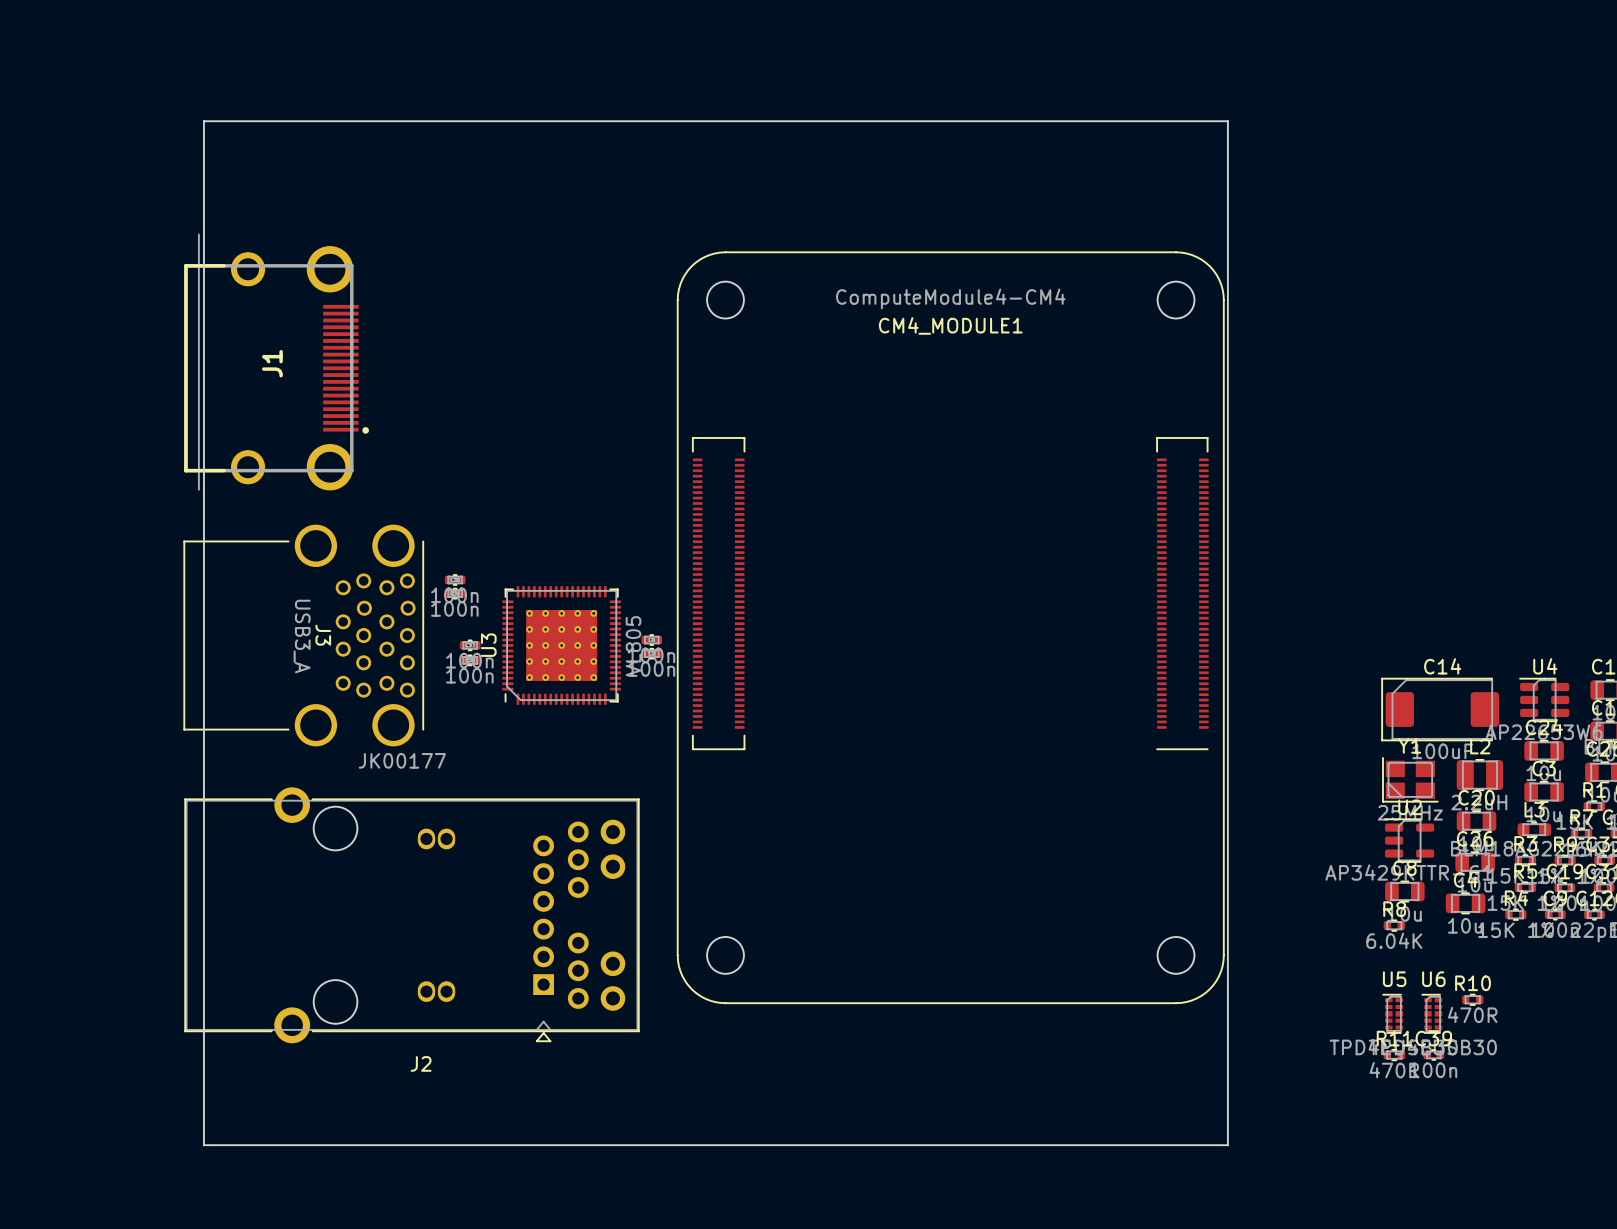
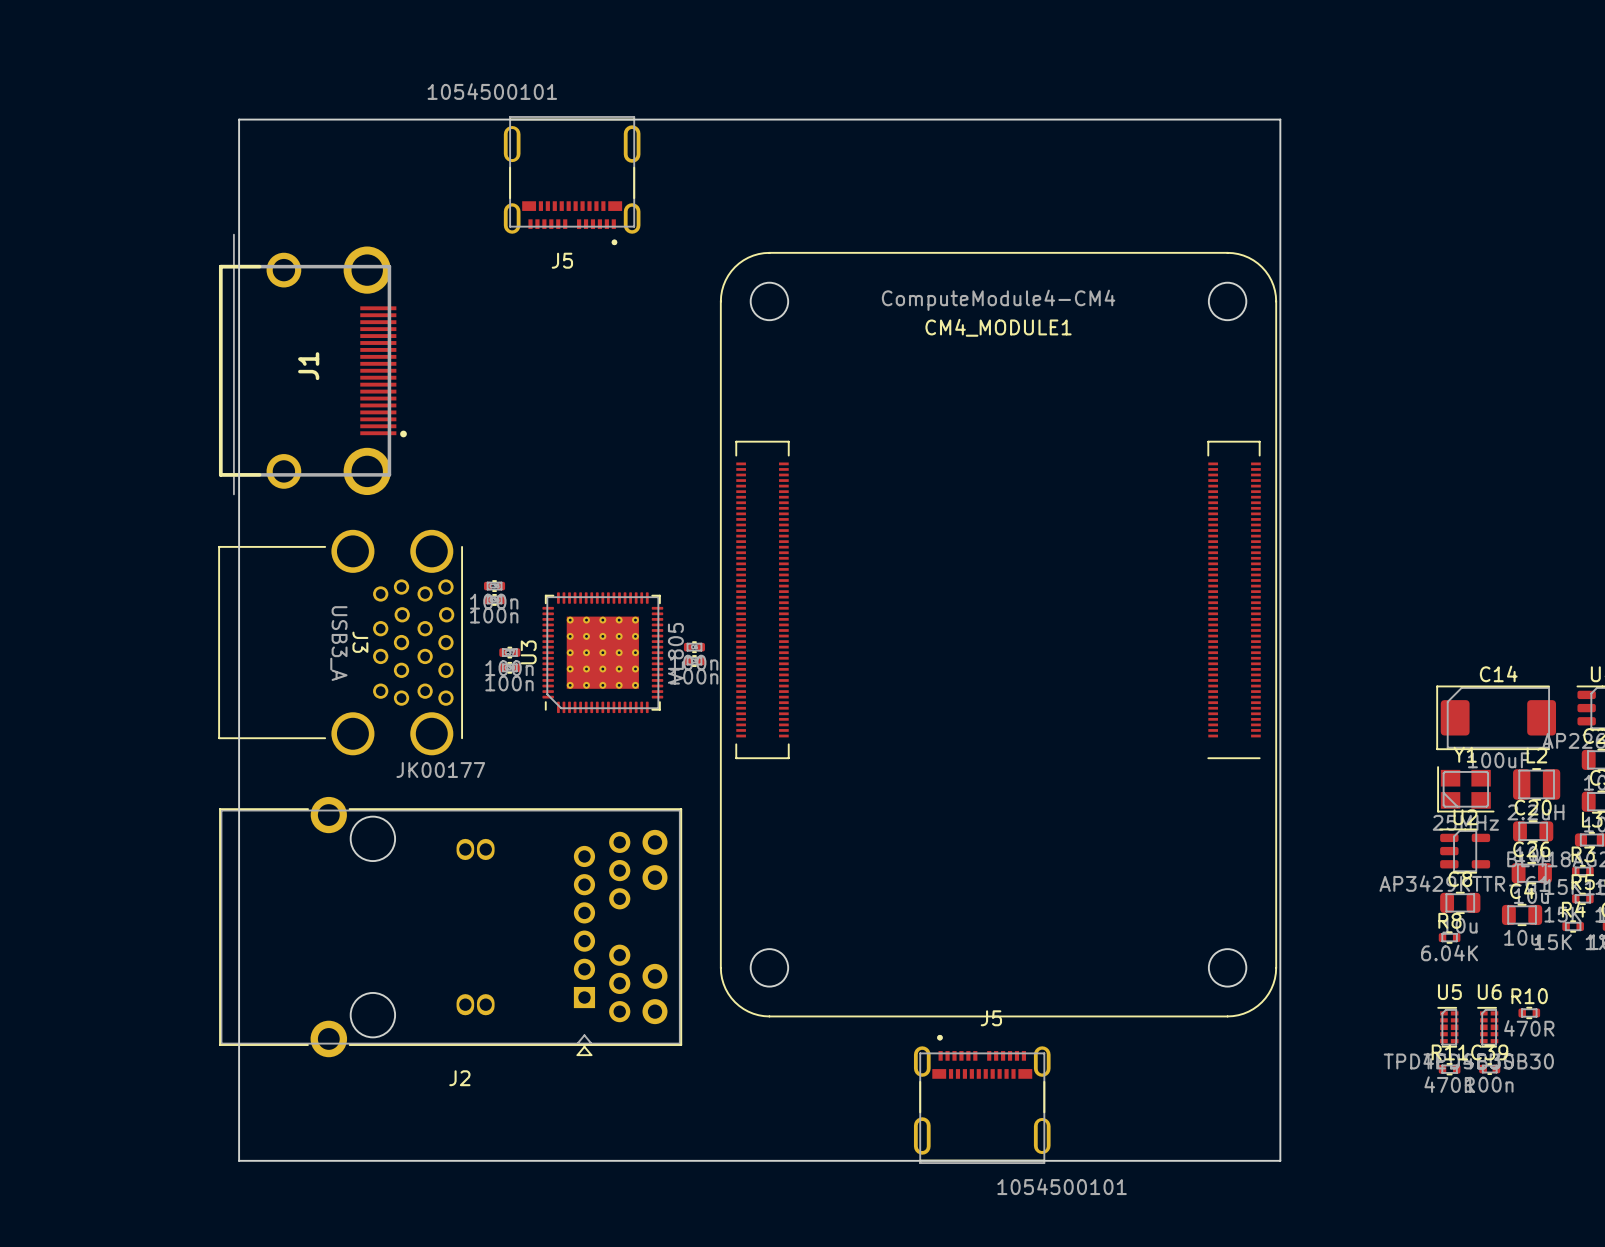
J5: none -> 1054500101 (572, 180)
J5: none -> 1054500101 (982, 1099)

